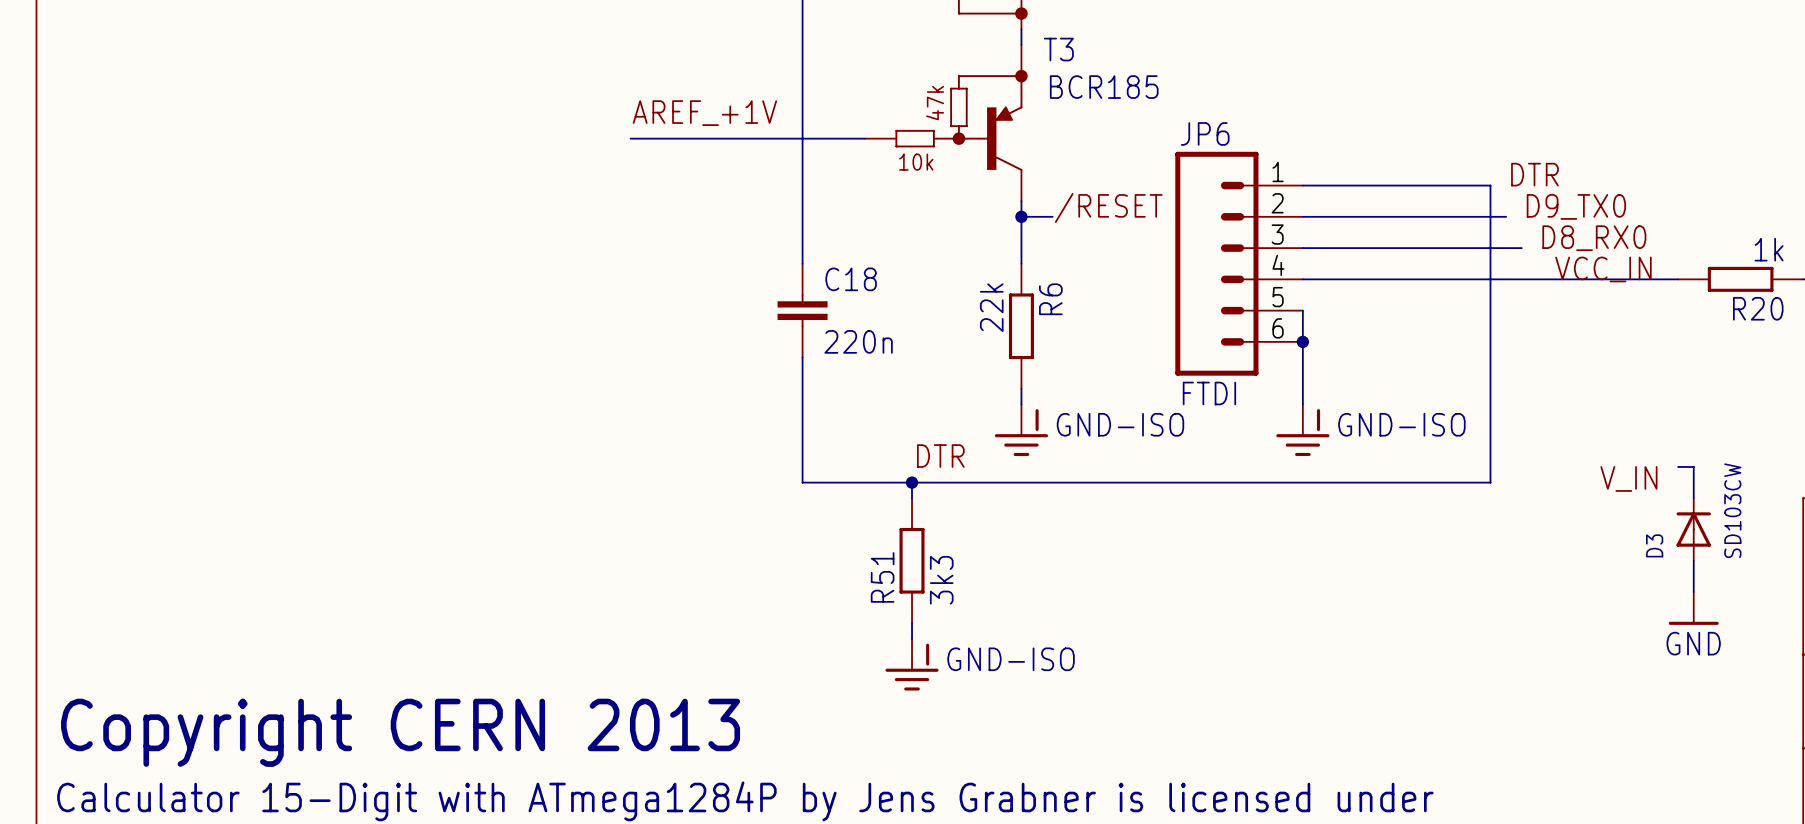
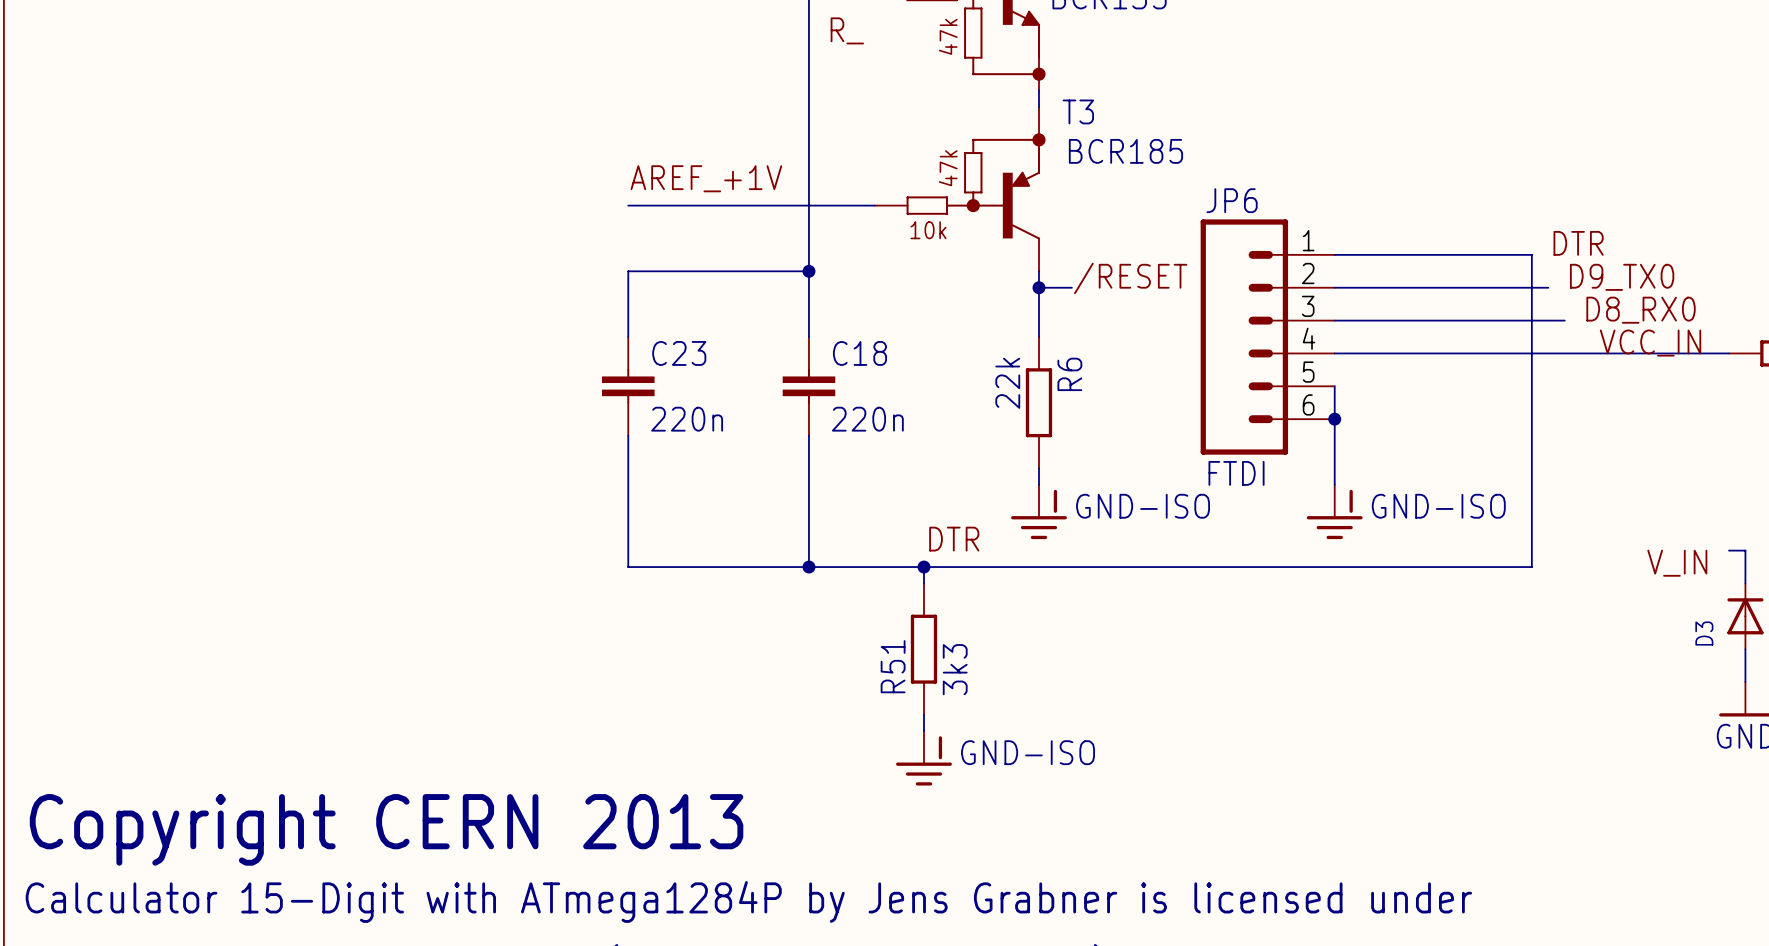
wire: none -> (808, 271) (628, 271) (628, 337)
junction: none -> (808, 271)
C23: none -> 220n (628, 386)
wire: none -> (628, 435) (628, 567) (808, 567)
junction: none -> (808, 567)

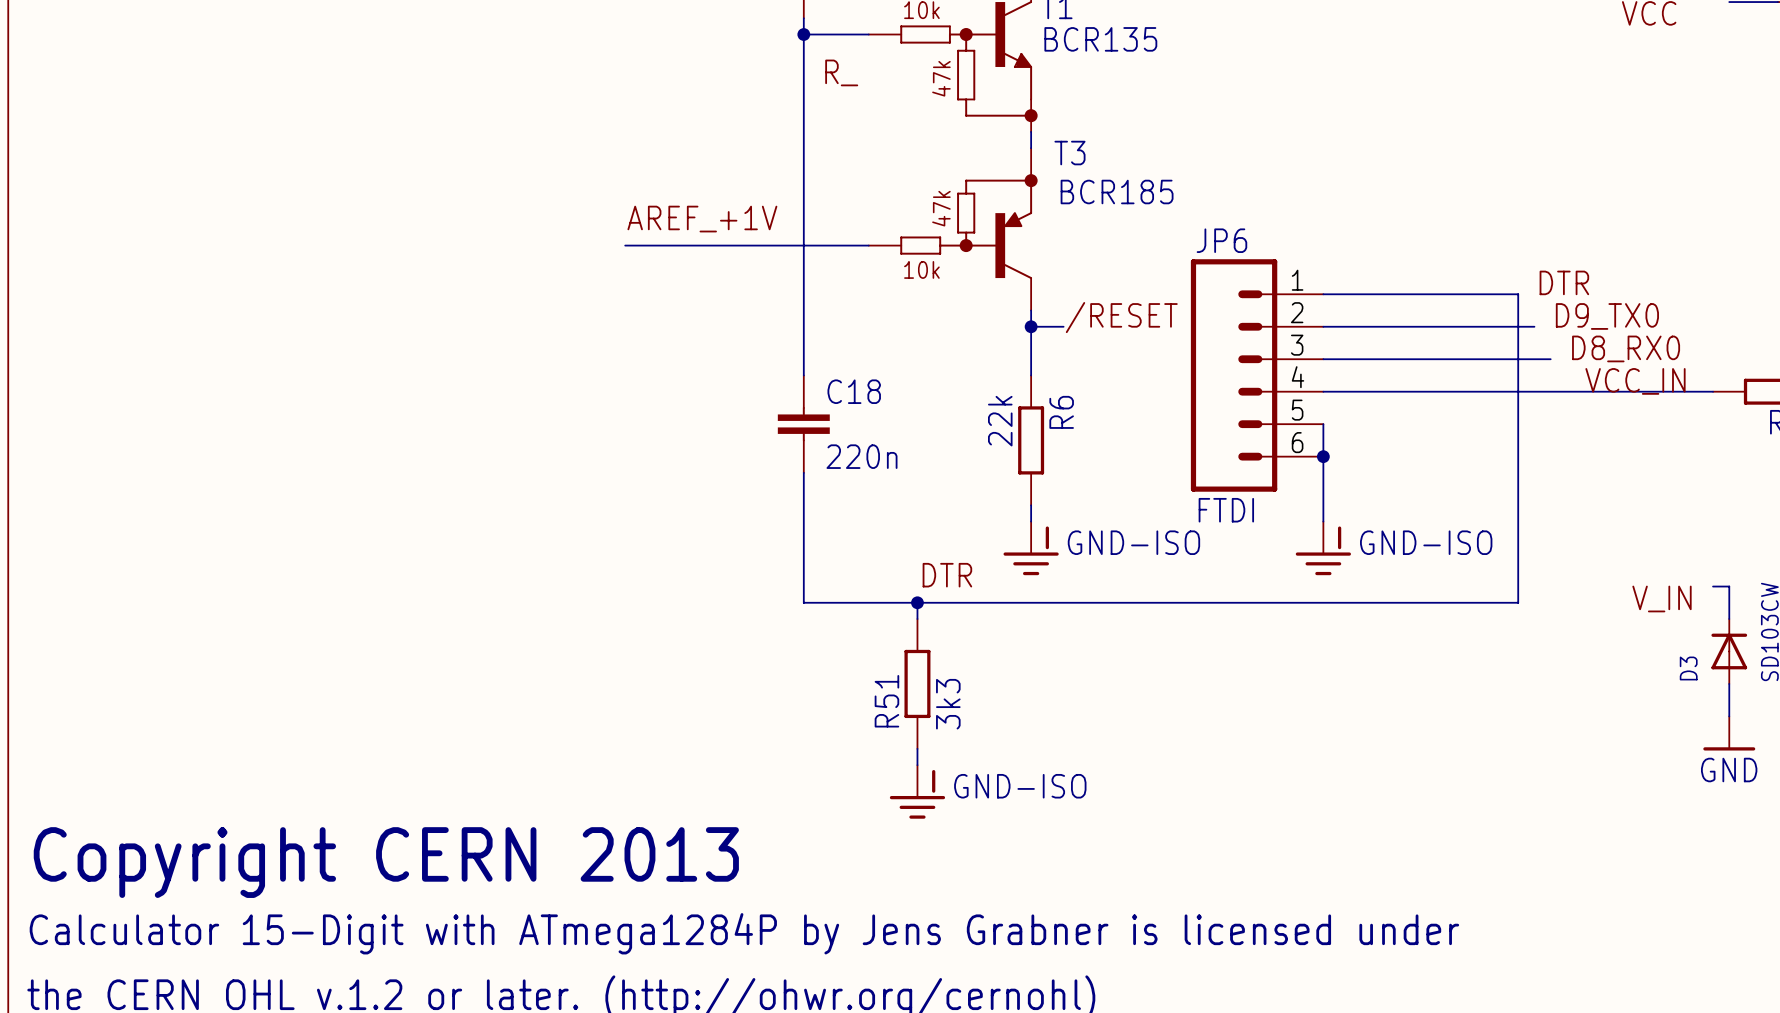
wire: (808, 271) (628, 271) (628, 337) -> none
junction: (808, 271) -> none
C23: 220n (628, 386) -> none
wire: (628, 435) (628, 567) (808, 567) -> none
junction: (808, 567) -> none

